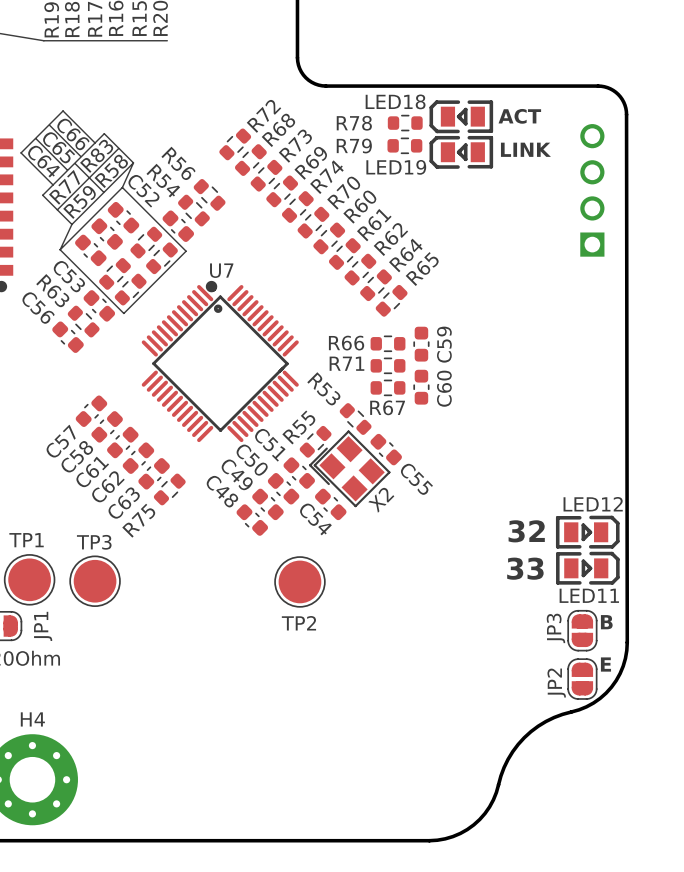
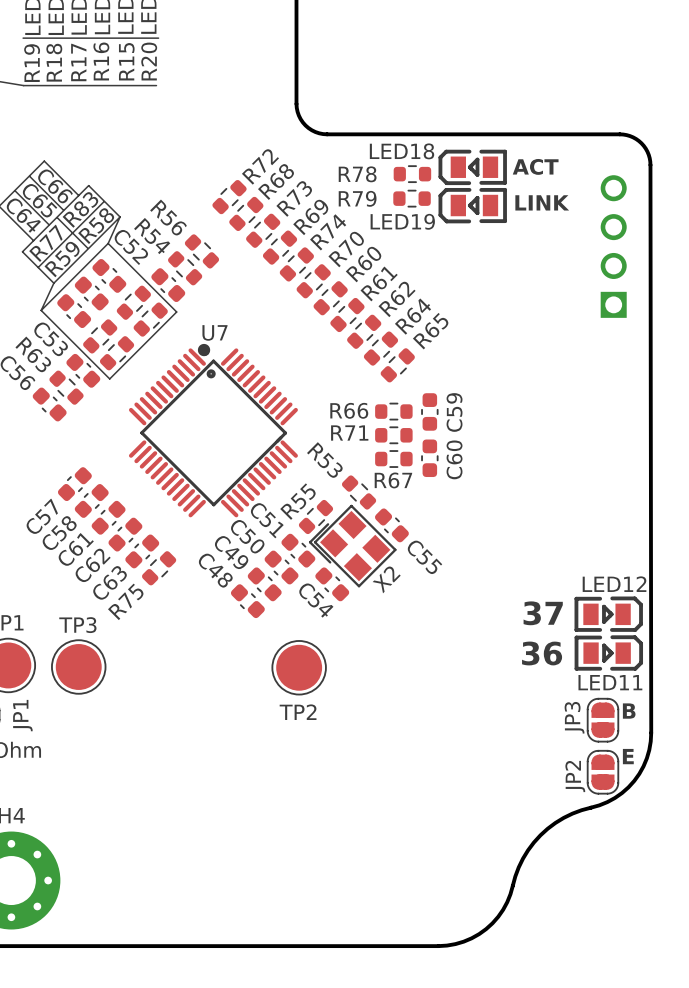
text: 32 (526, 531) -> 37 (543, 613)
text: 33 (525, 568) -> 36 (542, 653)

